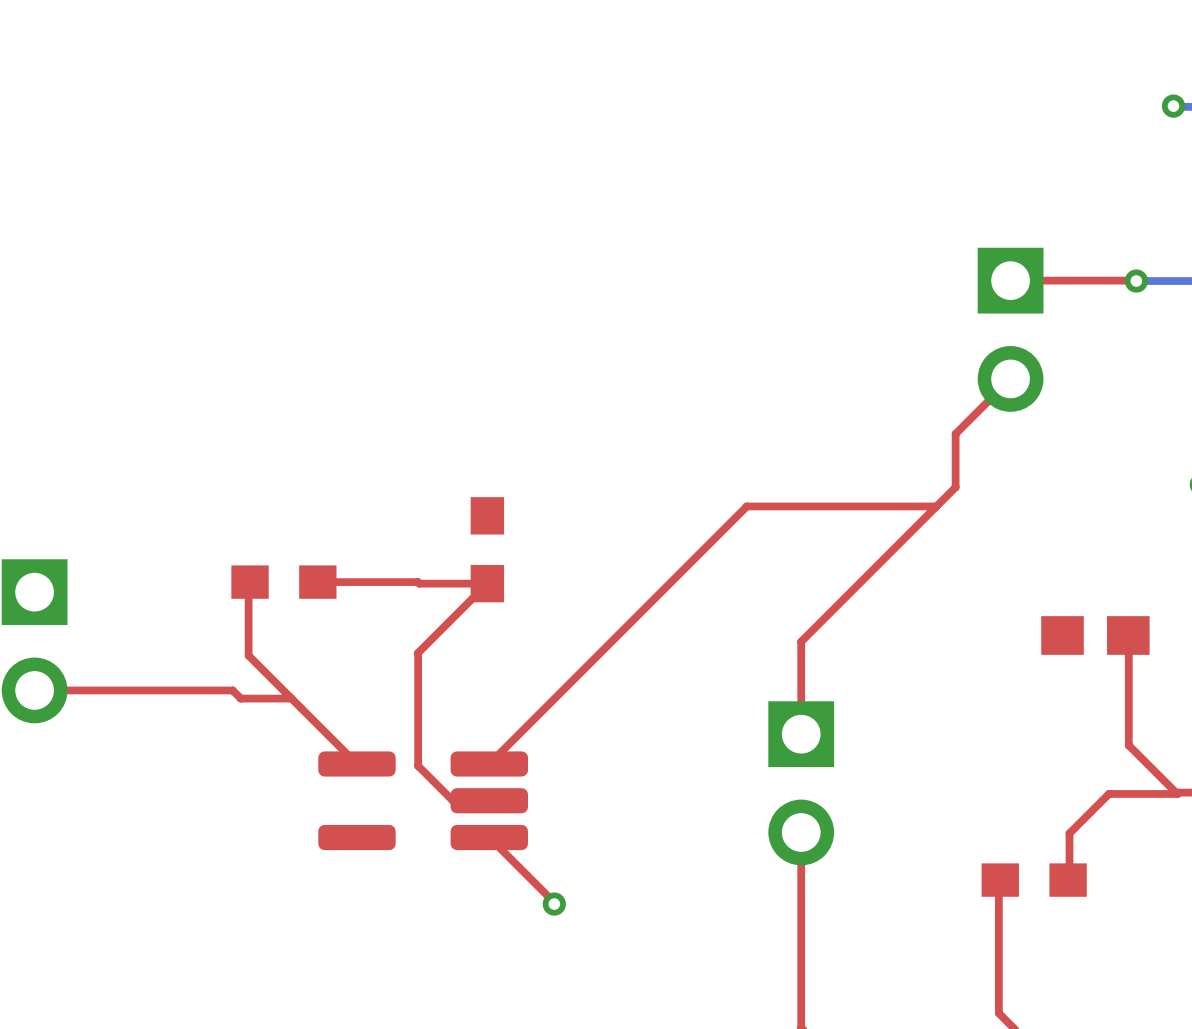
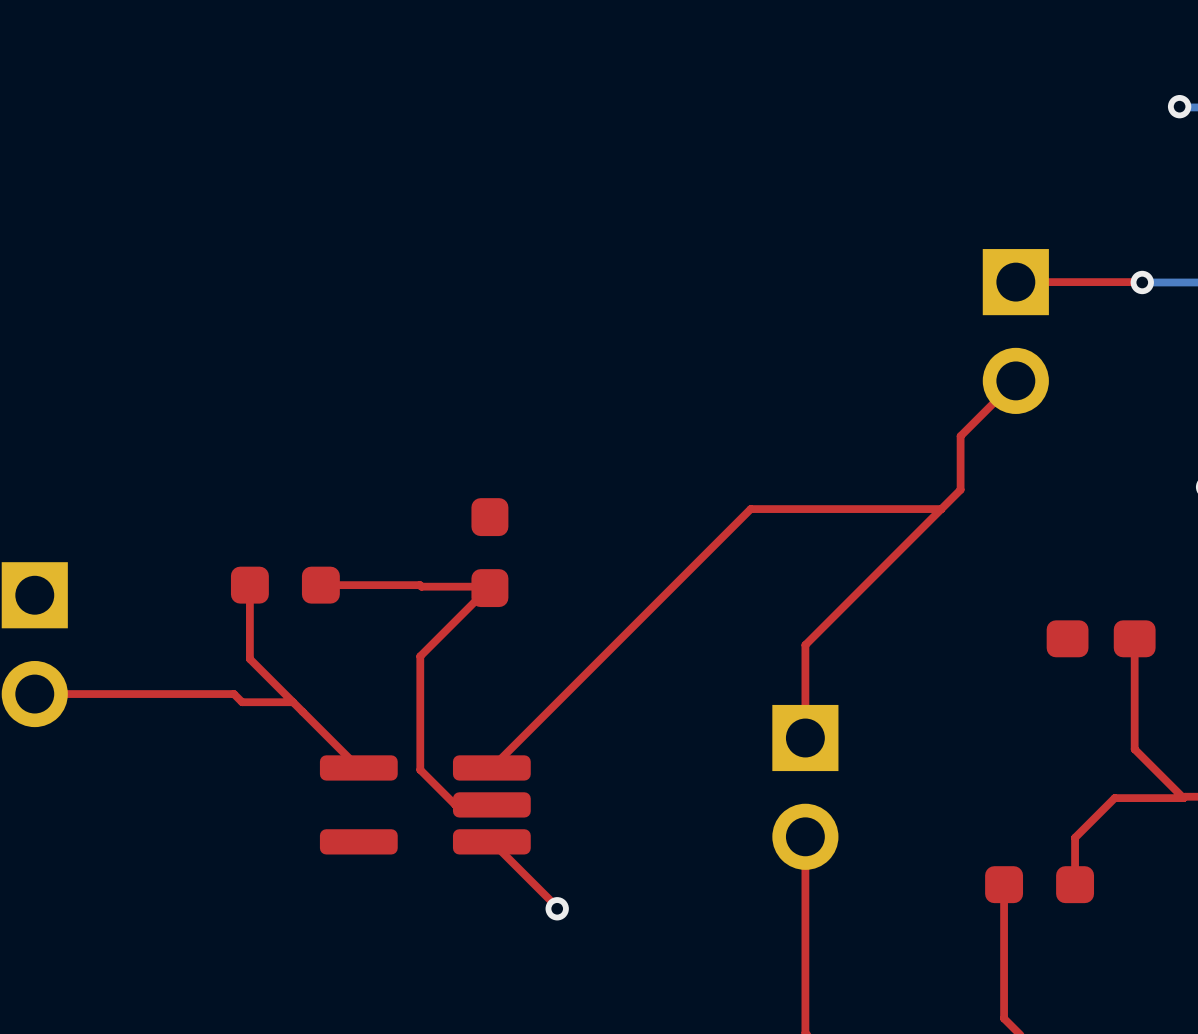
part footprint: [470, 497, 505, 603] -> [471, 498, 509, 608]
part footprint: [231, 565, 337, 599] -> [230, 566, 340, 604]
part footprint: [1041, 616, 1150, 655] -> [1046, 620, 1156, 658]
part footprint: [981, 863, 1087, 897] -> [985, 866, 1095, 904]

